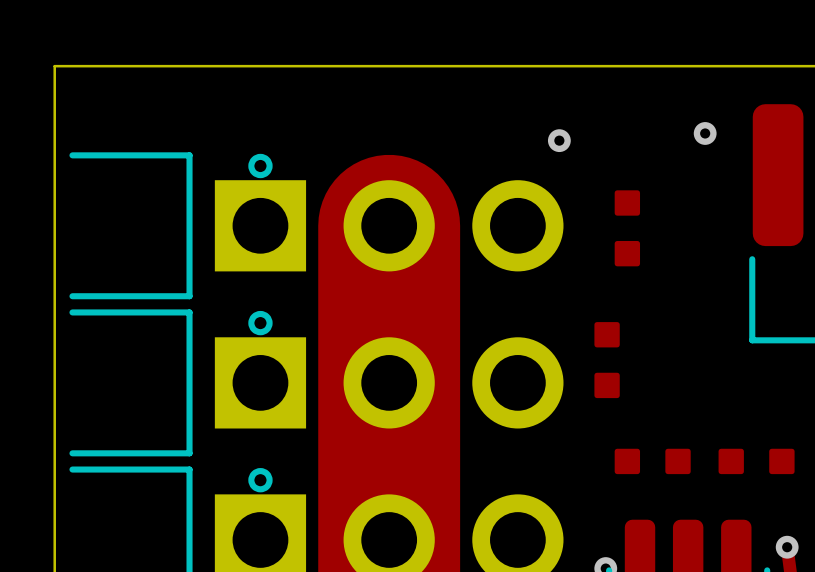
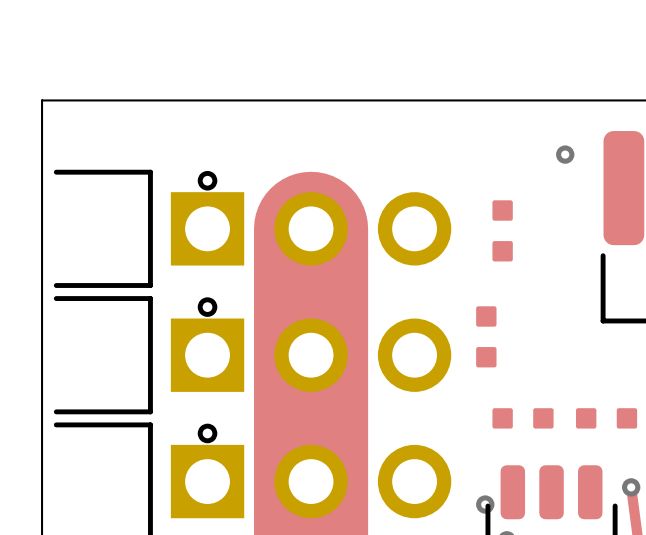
via: (559, 140) -> none

